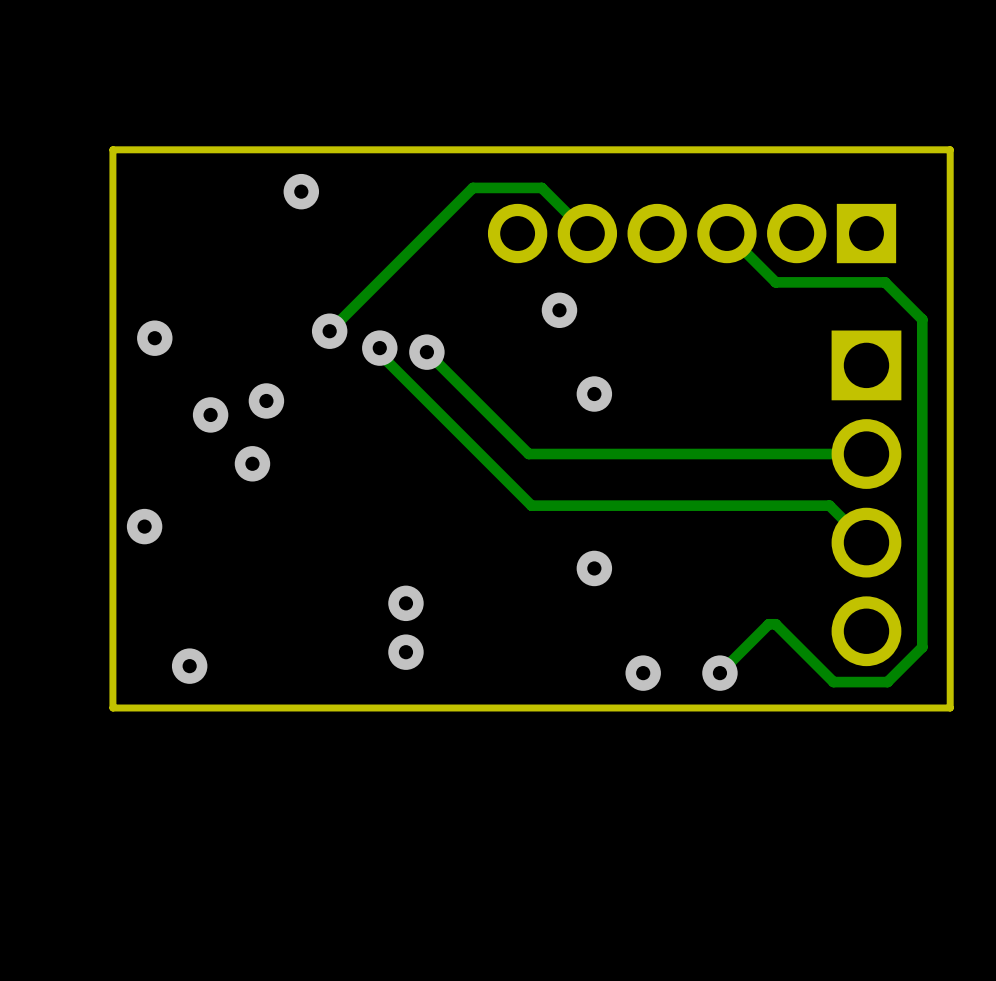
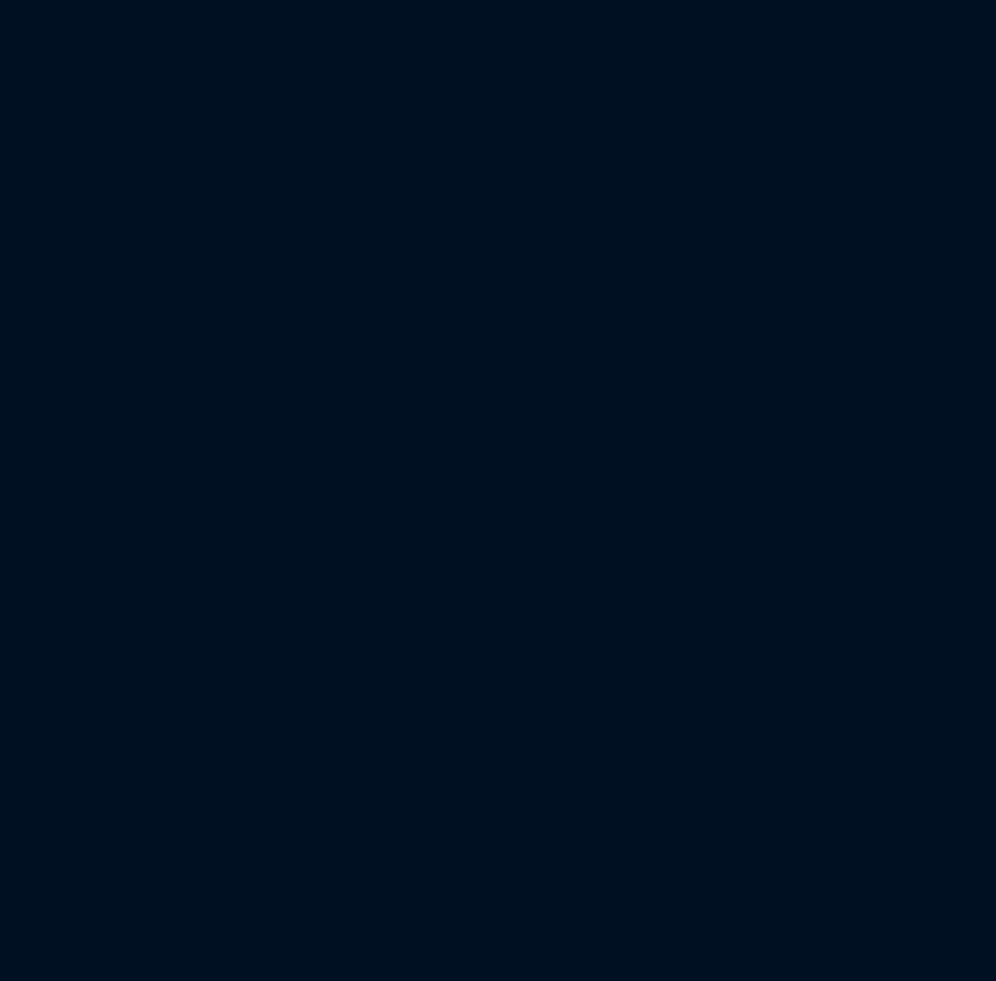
board edge: (950, 149) (112, 149) (112, 708) (950, 708) (950, 149) -> none
via: (301, 191) -> none
track: (587, 233) (541, 187) (472, 187) (329, 331) -> none
part: (692, 233) -> none
track: (726, 233) (775, 282) (885, 282) (922, 319) (922, 647) (887, 682) (833, 682) (775, 624) (768, 624) (719, 673) -> none
via: (559, 310) -> none
via: (329, 331) -> none
via: (154, 338) -> none
track: (379, 348) (379, 353) (531, 505) (829, 505) (866, 542) -> none
via: (379, 348) -> none
track: (426, 352) (528, 454) (866, 454) -> none
via: (426, 352) -> none
via: (594, 394) -> none
via: (266, 400) -> none
via: (210, 414) -> none
via: (252, 463) -> none
part: (866, 498) -> none
via: (144, 526) -> none
via: (594, 568) -> none
via: (405, 603) -> none
via: (405, 652) -> none
via: (189, 666) -> none
via: (643, 673) -> none
via: (719, 673) -> none

